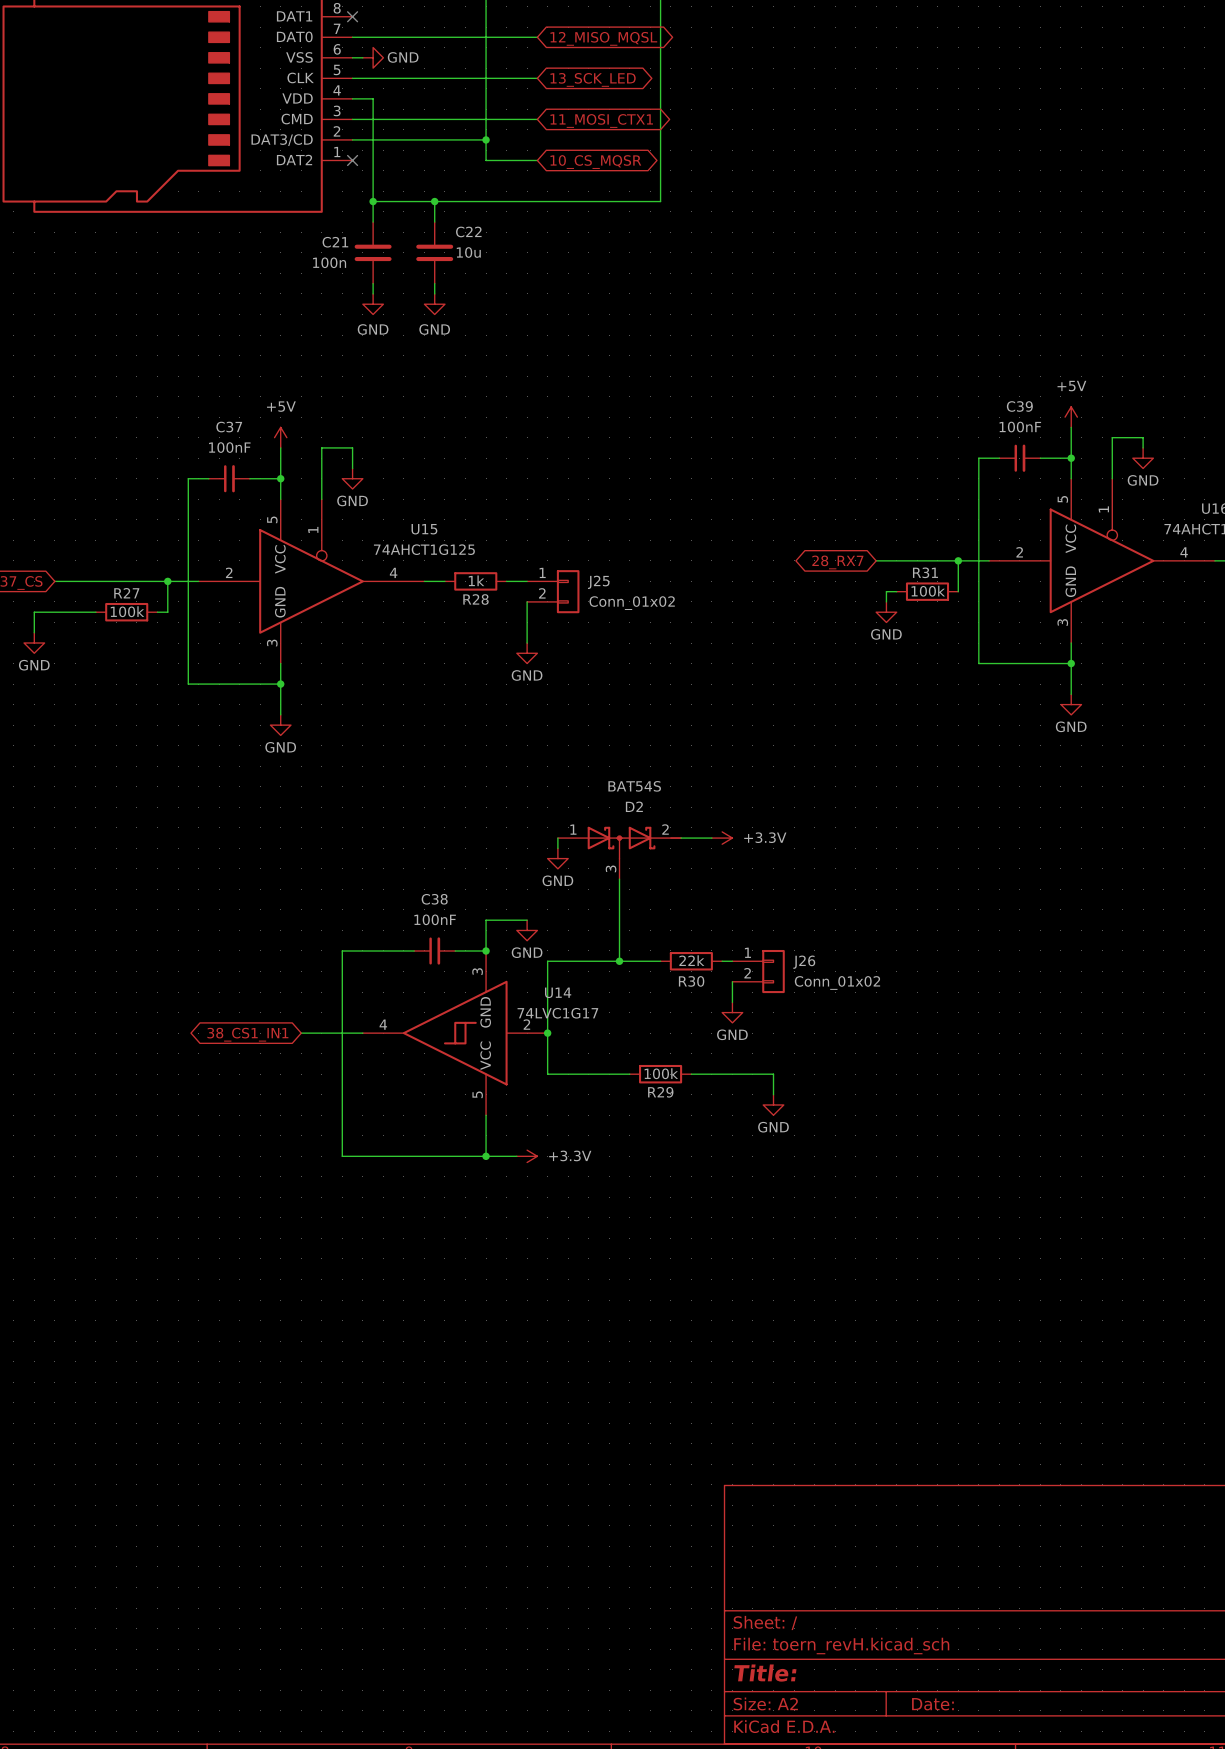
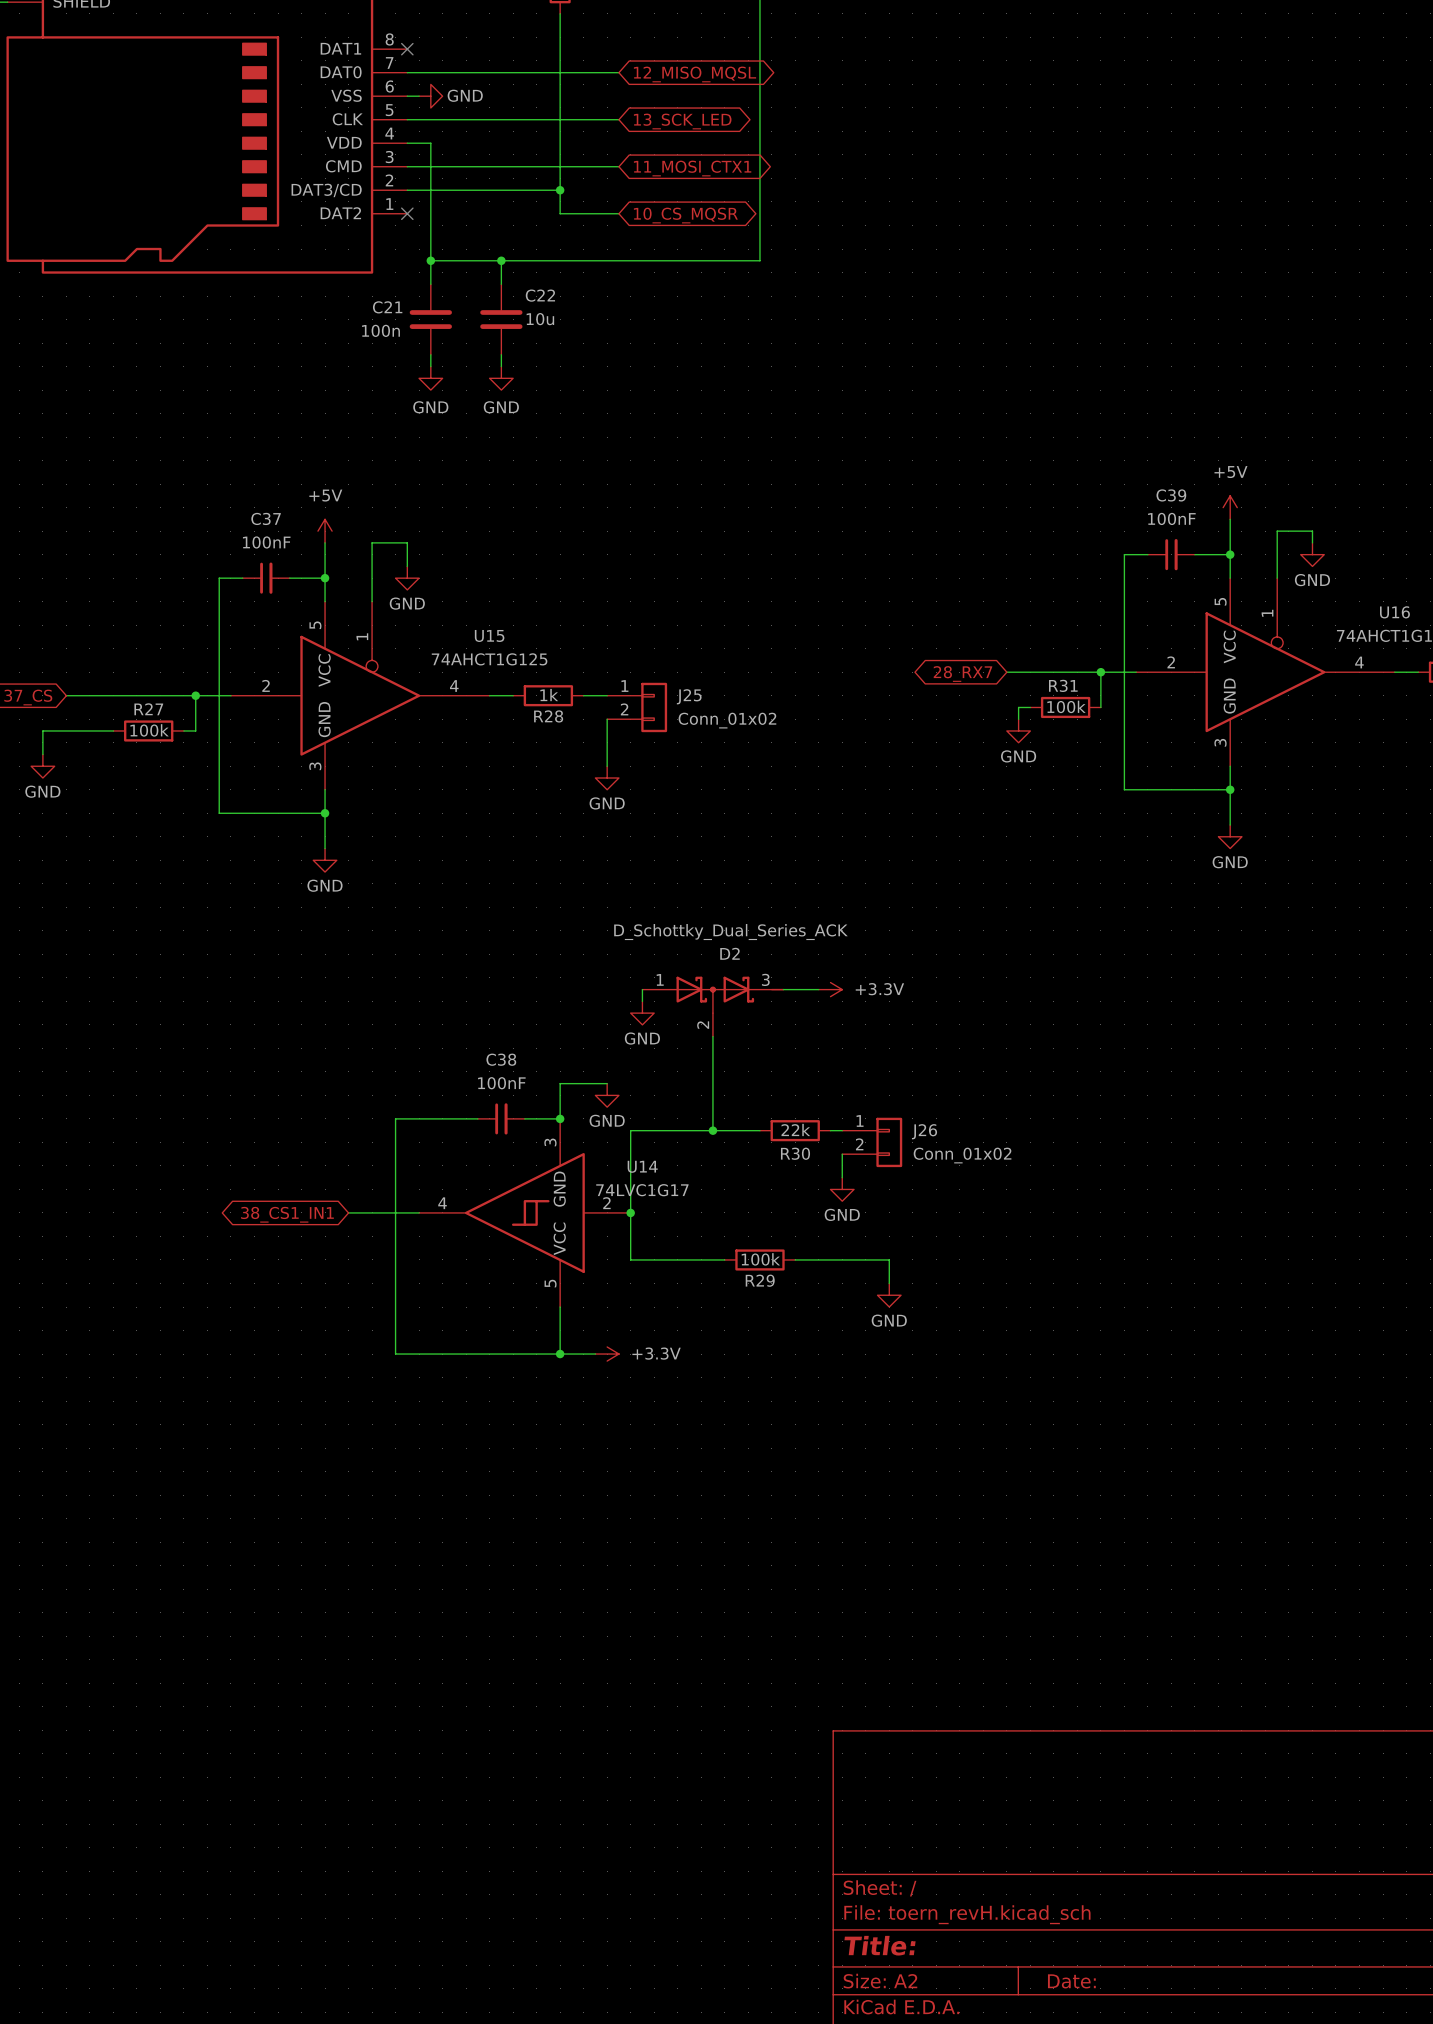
D2 value: BAT54S (634, 786) -> D_Schottky_Dual_Series_ACK (730, 932)
D2 pin number: 2 (665, 829) -> 3 (765, 979)
D2 pin number: 3 (611, 868) -> 2 (703, 1025)

